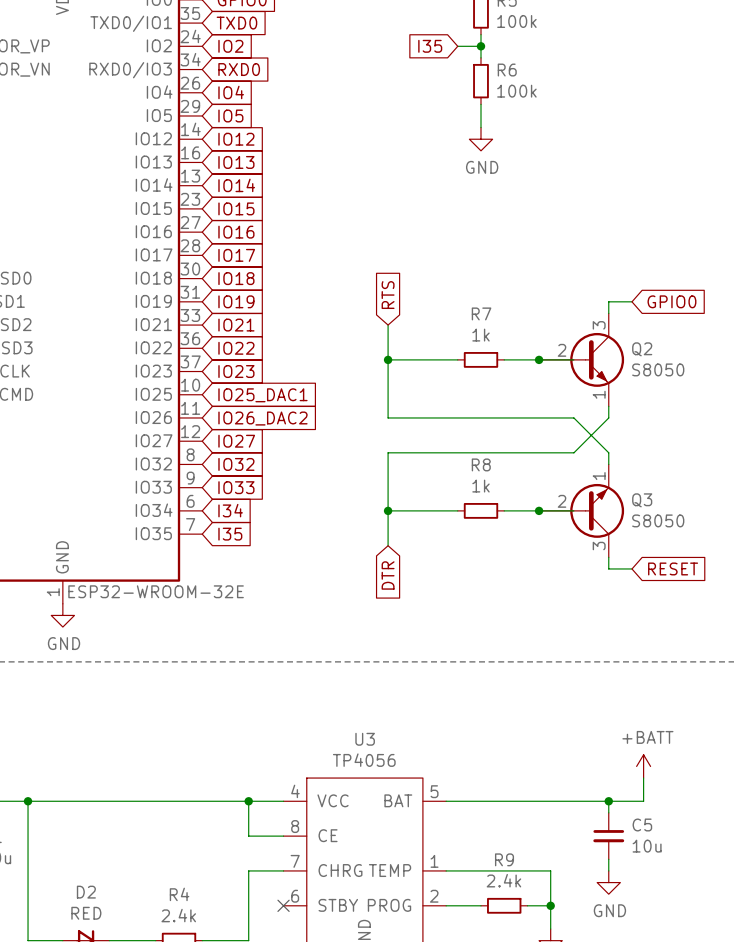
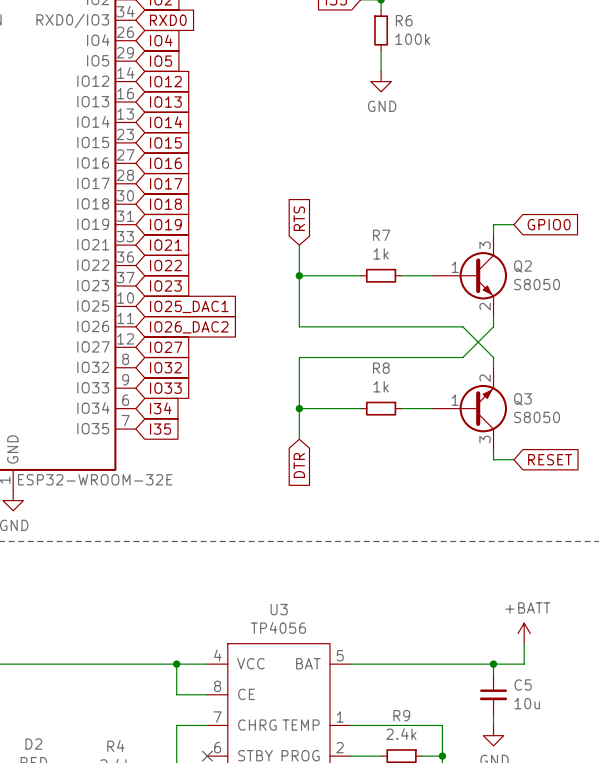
Q2 symbol: [539, 313, 625, 407] -> [432, 234, 508, 317]
junction: (539, 359) -> none
Q3 symbol: [539, 464, 625, 558] -> [432, 367, 508, 450]
junction: (539, 510) -> none

